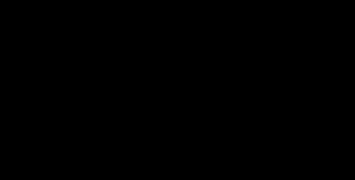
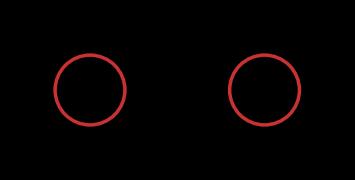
part: none -> (90, 90)
part: none -> (264, 90)

